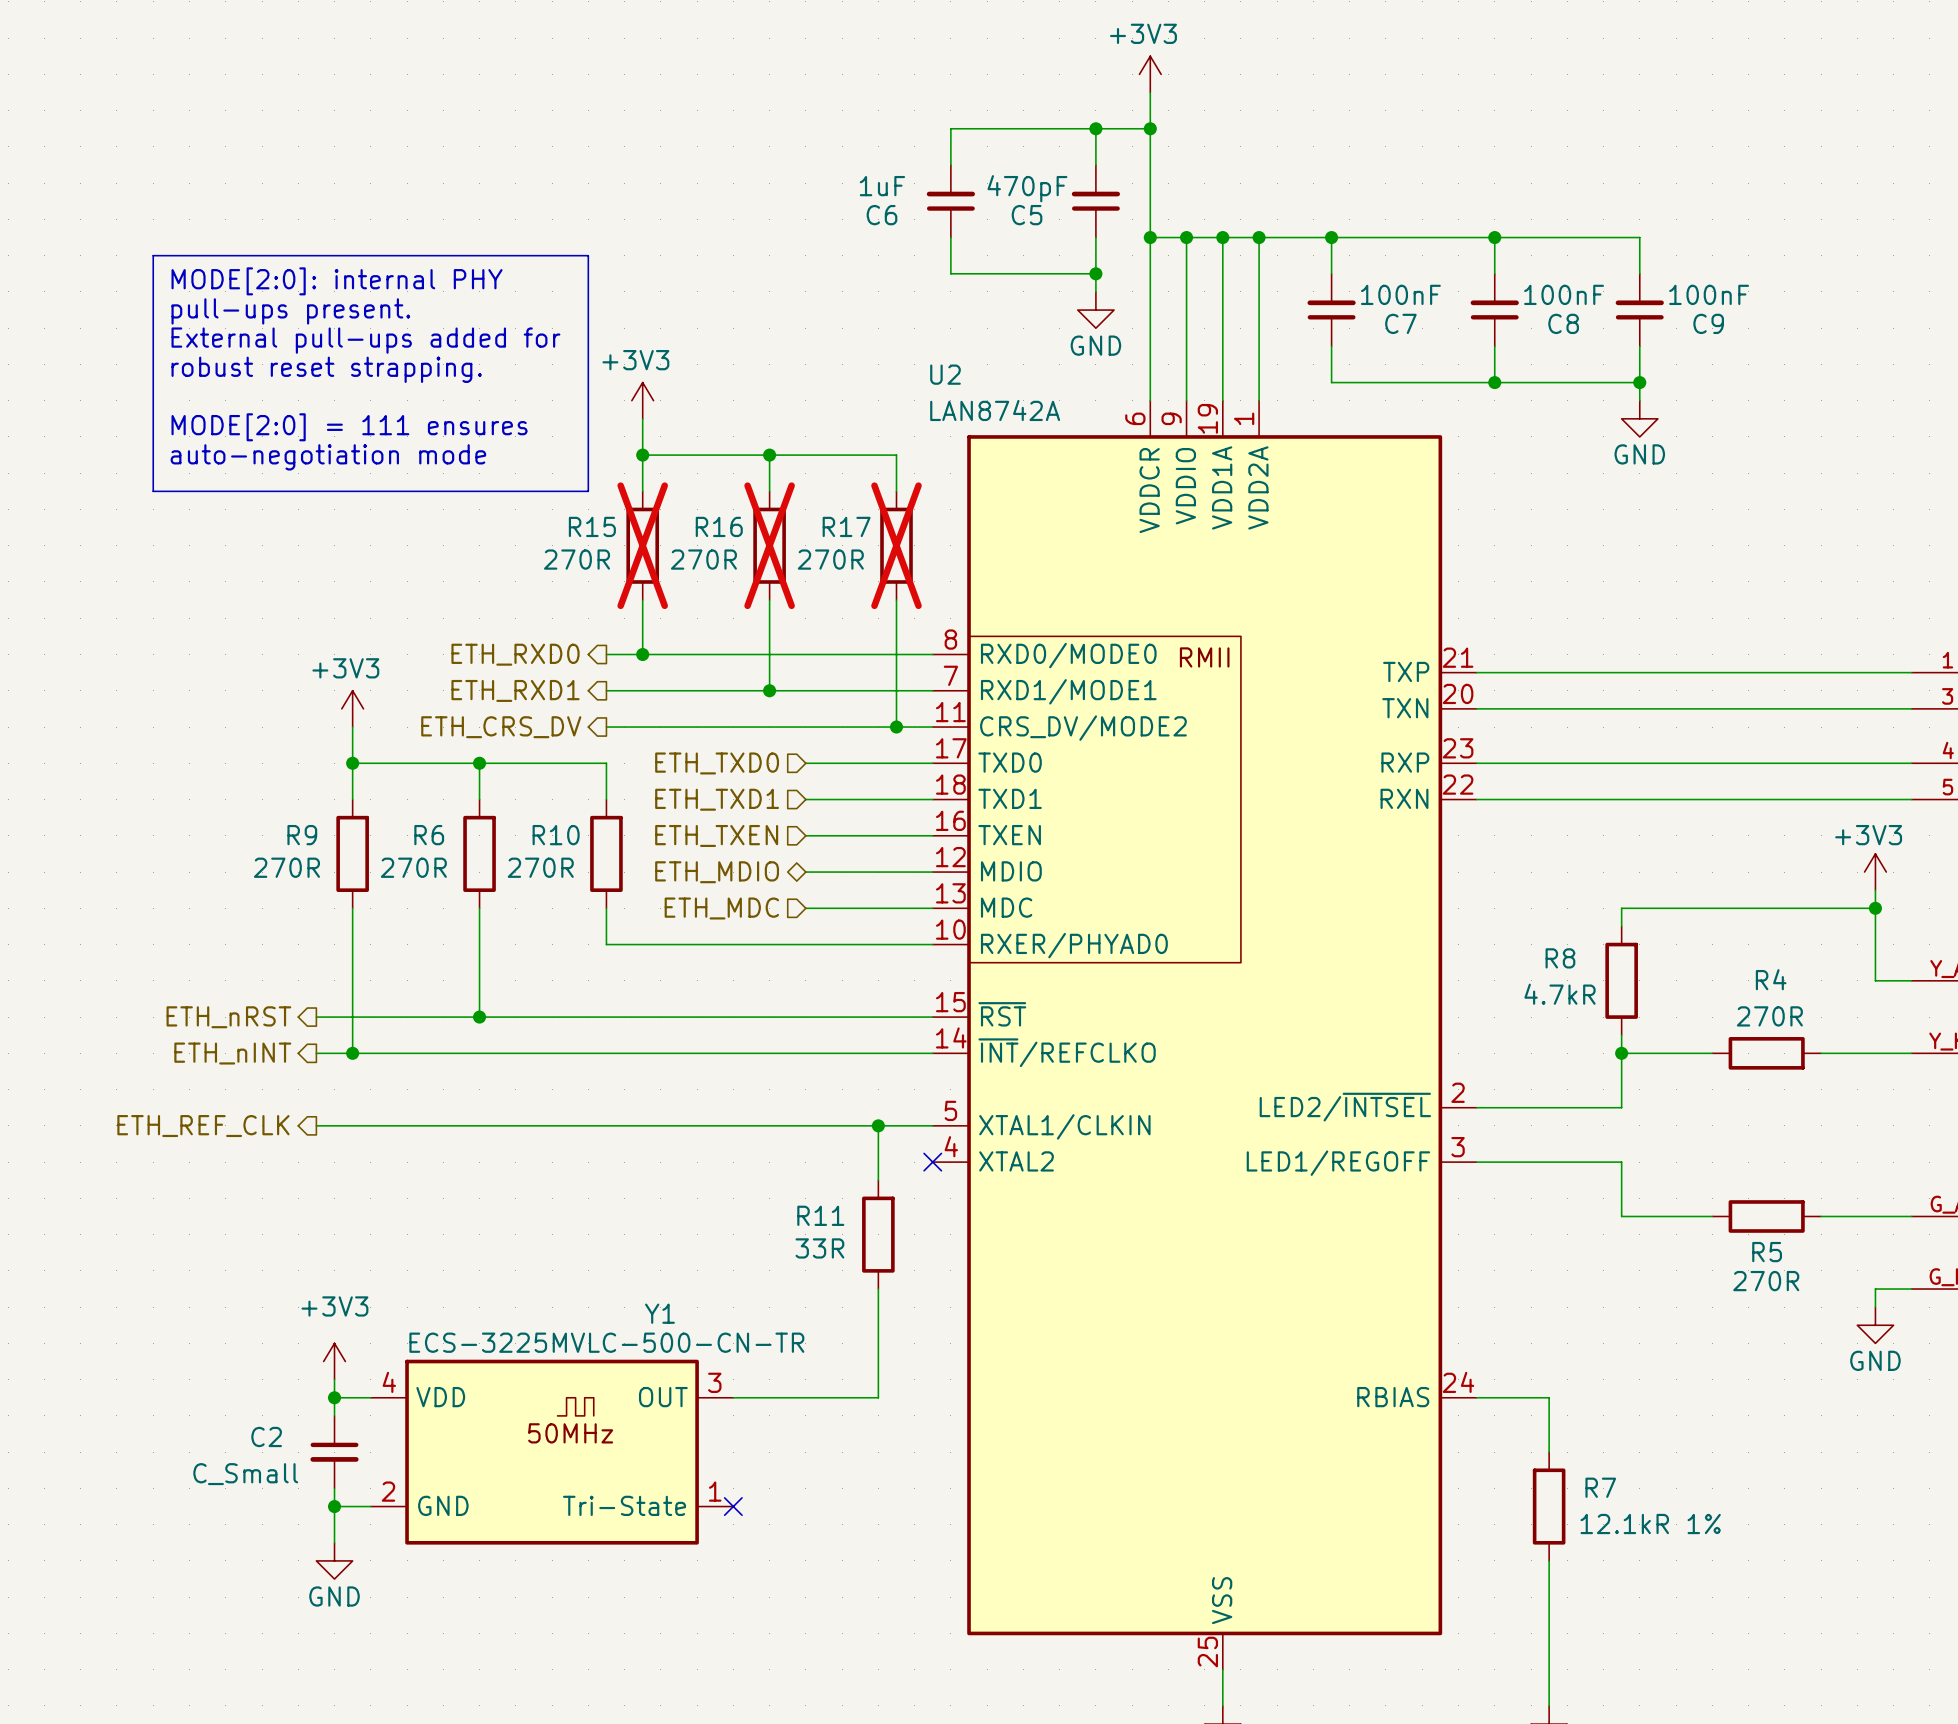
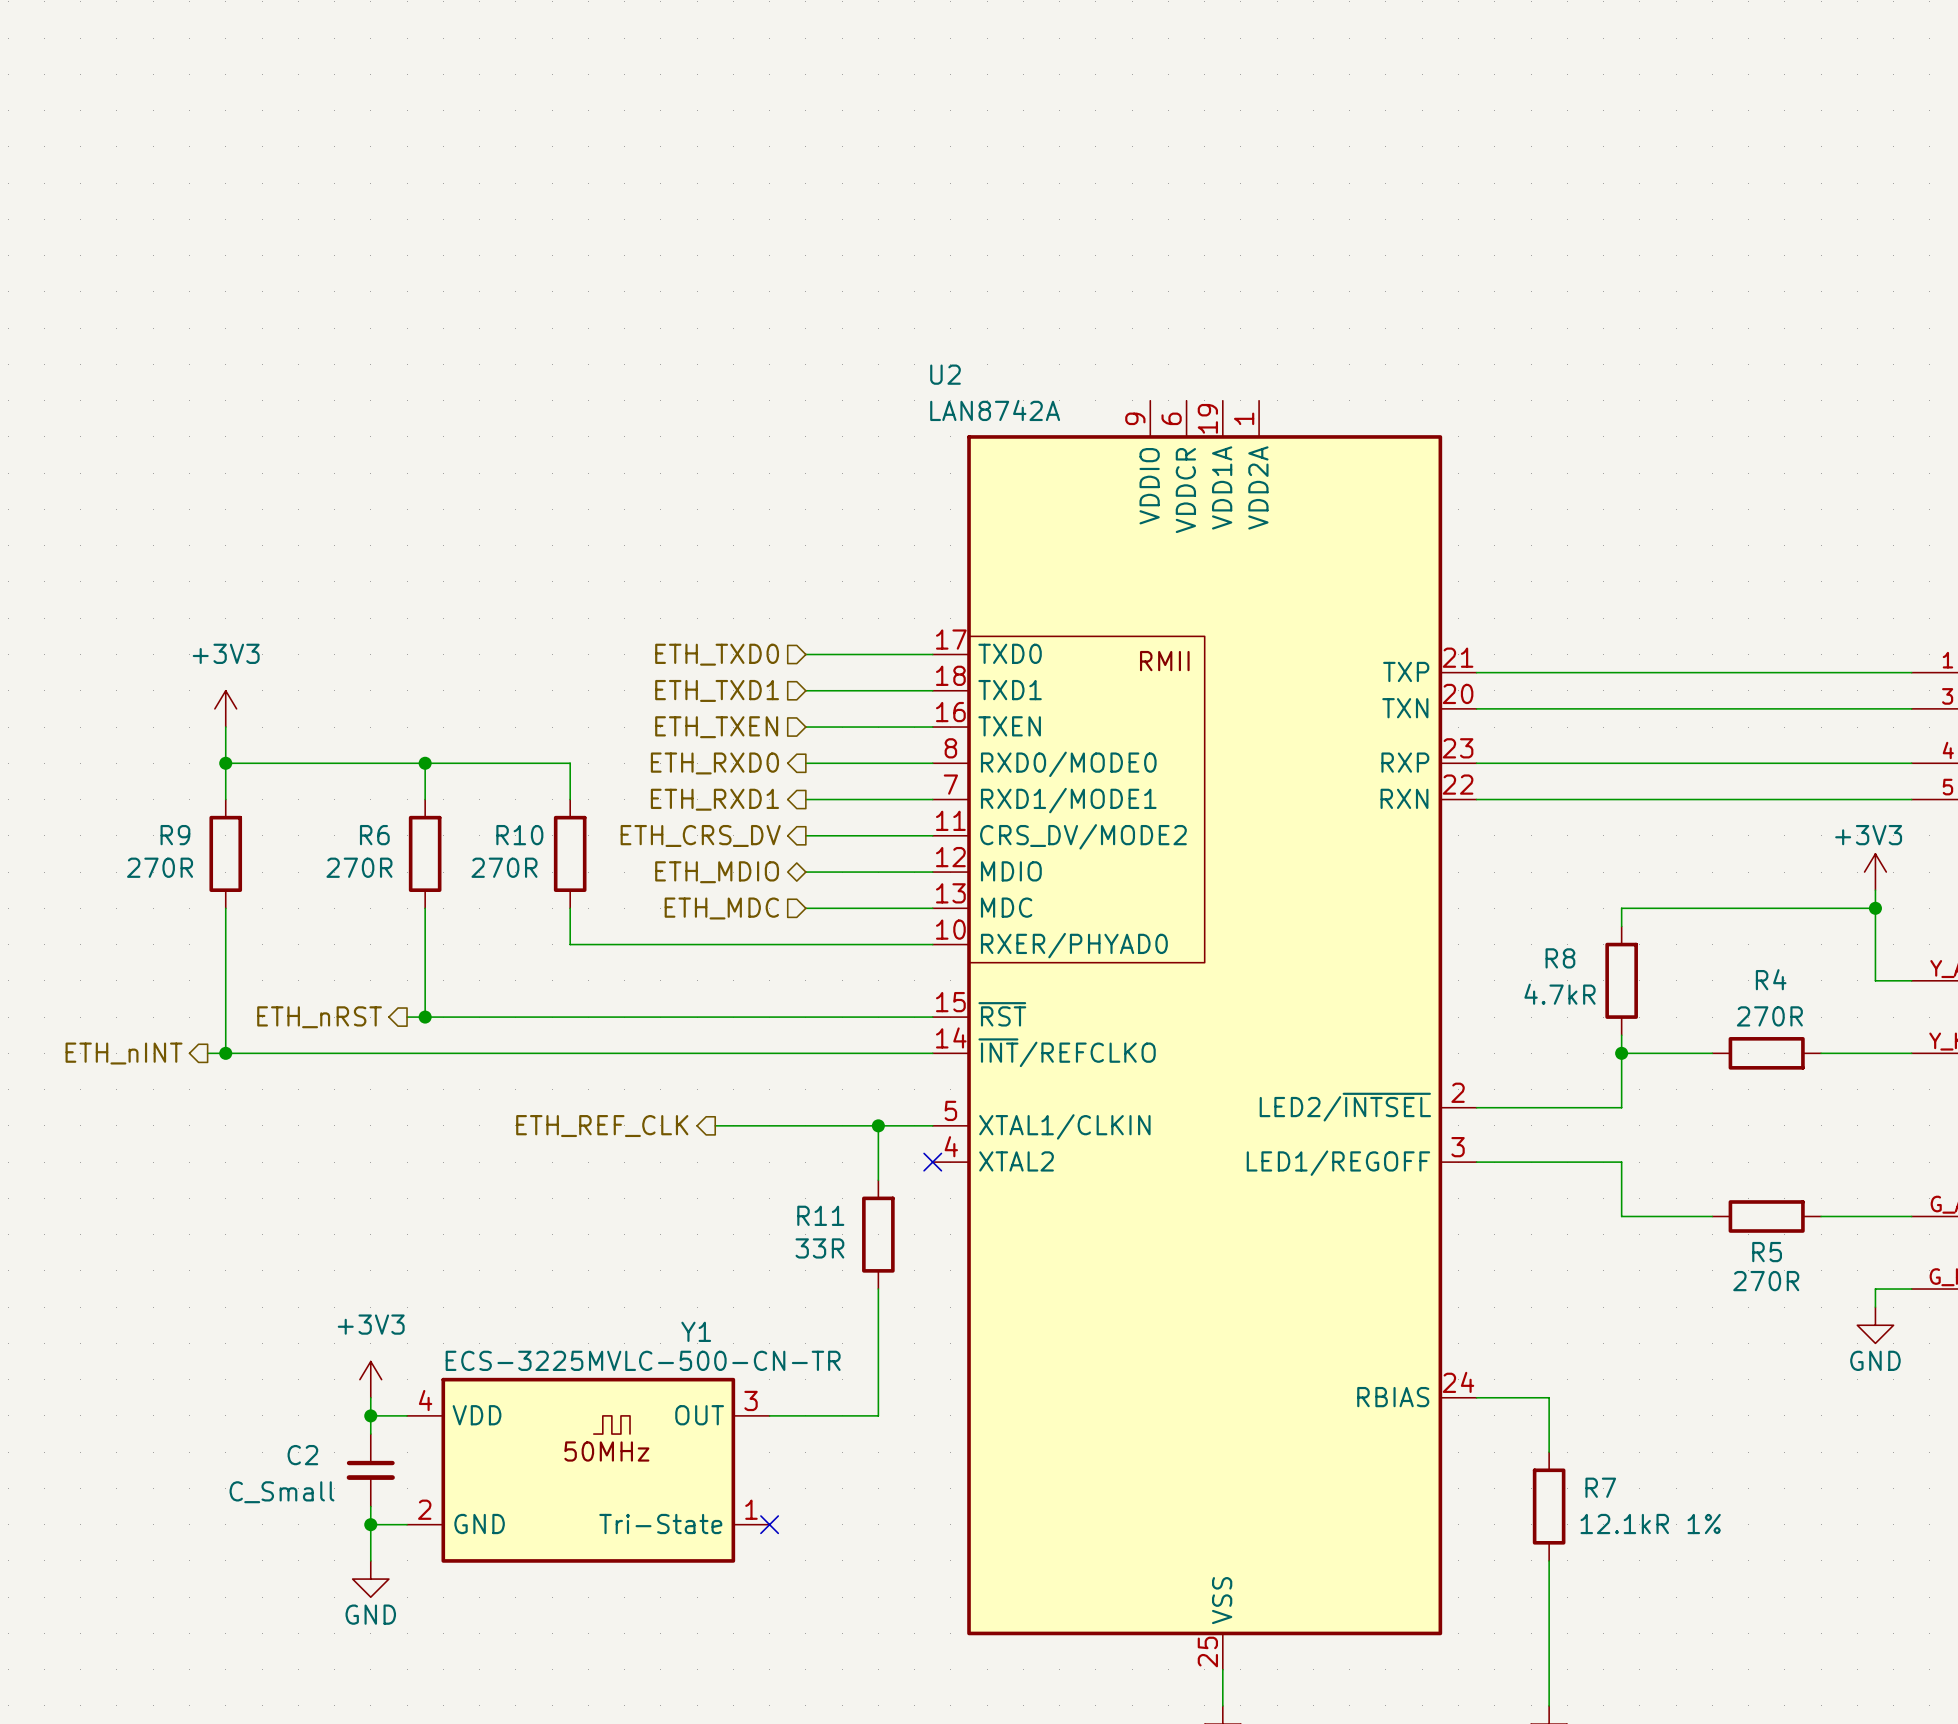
power symbol: +3V3 (1150, 74) -> none
wire: (1150, 92) (1150, 400) -> none
wire: (1095, 128) (1095, 165) -> none
junction: (1095, 128) -> none
wire: (1150, 128) (950, 128) (950, 165) -> none
junction: (1150, 128) -> none
C6: 1uF (950, 201) -> none
C5: 470pF (1095, 201) -> none
wire: (950, 237) (950, 273) (1095, 273) -> none
wire: (1095, 237) (1095, 291) -> none
wire: (1150, 237) (1639, 237) (1639, 273) -> none
junction: (1150, 237) -> none
wire: (1186, 237) (1186, 400) -> none
junction: (1186, 237) -> none
wire: (1222, 237) (1222, 400) -> none
junction: (1222, 237) -> none
wire: (1259, 237) (1259, 400) -> none
junction: (1259, 237) -> none
wire: (1331, 237) (1331, 273) -> none
junction: (1331, 237) -> none
wire: (1494, 237) (1494, 273) -> none
junction: (1494, 237) -> none
line: (153, 255) (588, 255) (588, 491) (153, 491) (153, 255) -> none
junction: (1095, 273) -> none
text: MODE[2:0]: internal PHY (337, 281) -> none
power symbol: GND (1095, 310) -> none
C7: 100nF (1331, 310) -> none
C8: 100nF (1494, 310) -> none
C9: 100nF (1639, 310) -> none
text: pull-ups present. (290, 311) -> none
text: External pull-ups added for (365, 340) -> none
wire: (1331, 346) (1331, 382) (1639, 382) -> none
wire: (1494, 346) (1494, 382) -> none
wire: (1639, 346) (1639, 400) -> none
text: robust reset strapping. (326, 369) -> none
junction: (1494, 382) -> none
junction: (1639, 382) -> none
power symbol: +3V3 (642, 400) -> none
U2 symbol: [932, 400, 1477, 1670] -> [932, 400, 1477, 1670]
wire: (642, 418) (642, 491) -> none
power symbol: GND (1639, 418) -> none
text: MODE[2:0] = 111 ensures (349, 427) -> none
wire: (642, 455) (896, 455) (896, 491) -> none
junction: (642, 455) -> none
wire: (769, 455) (769, 491) -> none
junction: (769, 455) -> none
text: auto-negotiation mode (328, 457) -> none
R15: 270R (642, 545) -> none
R16: 270R (769, 545) -> none
R17: 270R (896, 545) -> none
wire: (642, 600) (642, 654) -> none
wire: (769, 600) (769, 690) -> none
wire: (896, 600) (896, 727) -> none
hierarchical label: ETH_RXD0 (515, 654) -> none
wire: (606, 654) (805, 654) -> none
junction: (642, 654) -> none
hierarchical label: none -> ETH_TXD0 (717, 654)
power symbol text position: +3V3 (345, 668) -> +3V3 (226, 653)
hierarchical label: ETH_RXD1 (515, 690) -> none
wire: (606, 690) (805, 690) -> none
hierarchical label: none -> ETH_TXD1 (717, 690)
junction: (769, 690) -> none
power symbol position: +3V3 (352, 708) -> +3V3 (225, 708)
wire: (352, 727) (352, 799) -> (225, 727) (225, 799)
hierarchical label: ETH_CRS_DV (501, 727) -> none
wire: (606, 727) (805, 727) -> none
hierarchical label: none -> ETH_TXEN (716, 727)
junction: (896, 727) -> none
wire: none -> (225, 763) (352, 763)
junction: none -> (225, 763)
junction: (352, 763) -> none
junction: none -> (425, 763)
wire: (479, 763) (479, 799) -> (425, 763) (425, 799)
junction: (479, 763) -> none
wire: (570, 763) (606, 763) (606, 799) -> (570, 763) (570, 799)
hierarchical label shape: input (717, 763) -> output (714, 763)
hierarchical label: ETH_TXD0 (717, 763) -> ETH_RXD0 (714, 763)
hierarchical label shape: input (717, 799) -> output (714, 799)
hierarchical label: ETH_TXD1 (717, 799) -> ETH_RXD1 (714, 799)
hierarchical label shape: input (716, 835) -> output (700, 835)
hierarchical label: ETH_TXEN (716, 835) -> ETH_CRS_DV (700, 835)
R9 position: (352, 853) -> (225, 853)
R6 position: (479, 853) -> (425, 853)
R10 position: (606, 853) -> (570, 853)
wire: (352, 908) (352, 1053) -> (225, 908) (225, 1053)
wire: (479, 908) (479, 1017) -> (425, 908) (425, 1017)
wire: (606, 908) (606, 944) -> (570, 908) (570, 944) (606, 944)
hierarchical label position: ETH_nRST (228, 1017) -> ETH_nRST (319, 1017)
wire: (316, 1017) (407, 1017) -> none
junction: none -> (425, 1017)
junction: (479, 1017) -> none
wire: none -> (207, 1053) (316, 1053)
junction: none -> (225, 1053)
hierarchical label position: ETH_nINT (232, 1053) -> ETH_nINT (124, 1053)
junction: (352, 1053) -> none
wire: (316, 1125) (715, 1125) -> none
hierarchical label: ETH_REF_CLK (203, 1126) -> none
hierarchical label: none -> ETH_REF_CLK (602, 1126)
power symbol position: +3V3 (334, 1361) -> +3V3 (370, 1379)
wire: (334, 1379) (334, 1415) -> none
wire: (334, 1397) (370, 1397) -> (370, 1434) (370, 1397)
junction position: (334, 1397) -> (370, 1415)
wire: (733, 1397) (878, 1397) -> (769, 1415) (878, 1415) (878, 1397)
wire: none -> (370, 1415) (407, 1415)
C2 position: (334, 1452) -> (370, 1470)
Y1 position: (552, 1452) -> (588, 1470)
wire: (334, 1488) (334, 1542) -> none
wire: (334, 1506) (370, 1506) -> (370, 1560) (370, 1506)
junction position: (334, 1506) -> (370, 1524)
no-connect mark position: (733, 1506) -> (769, 1524)
wire: none -> (370, 1524) (407, 1524)
power symbol position: GND (334, 1560) -> GND (370, 1579)

